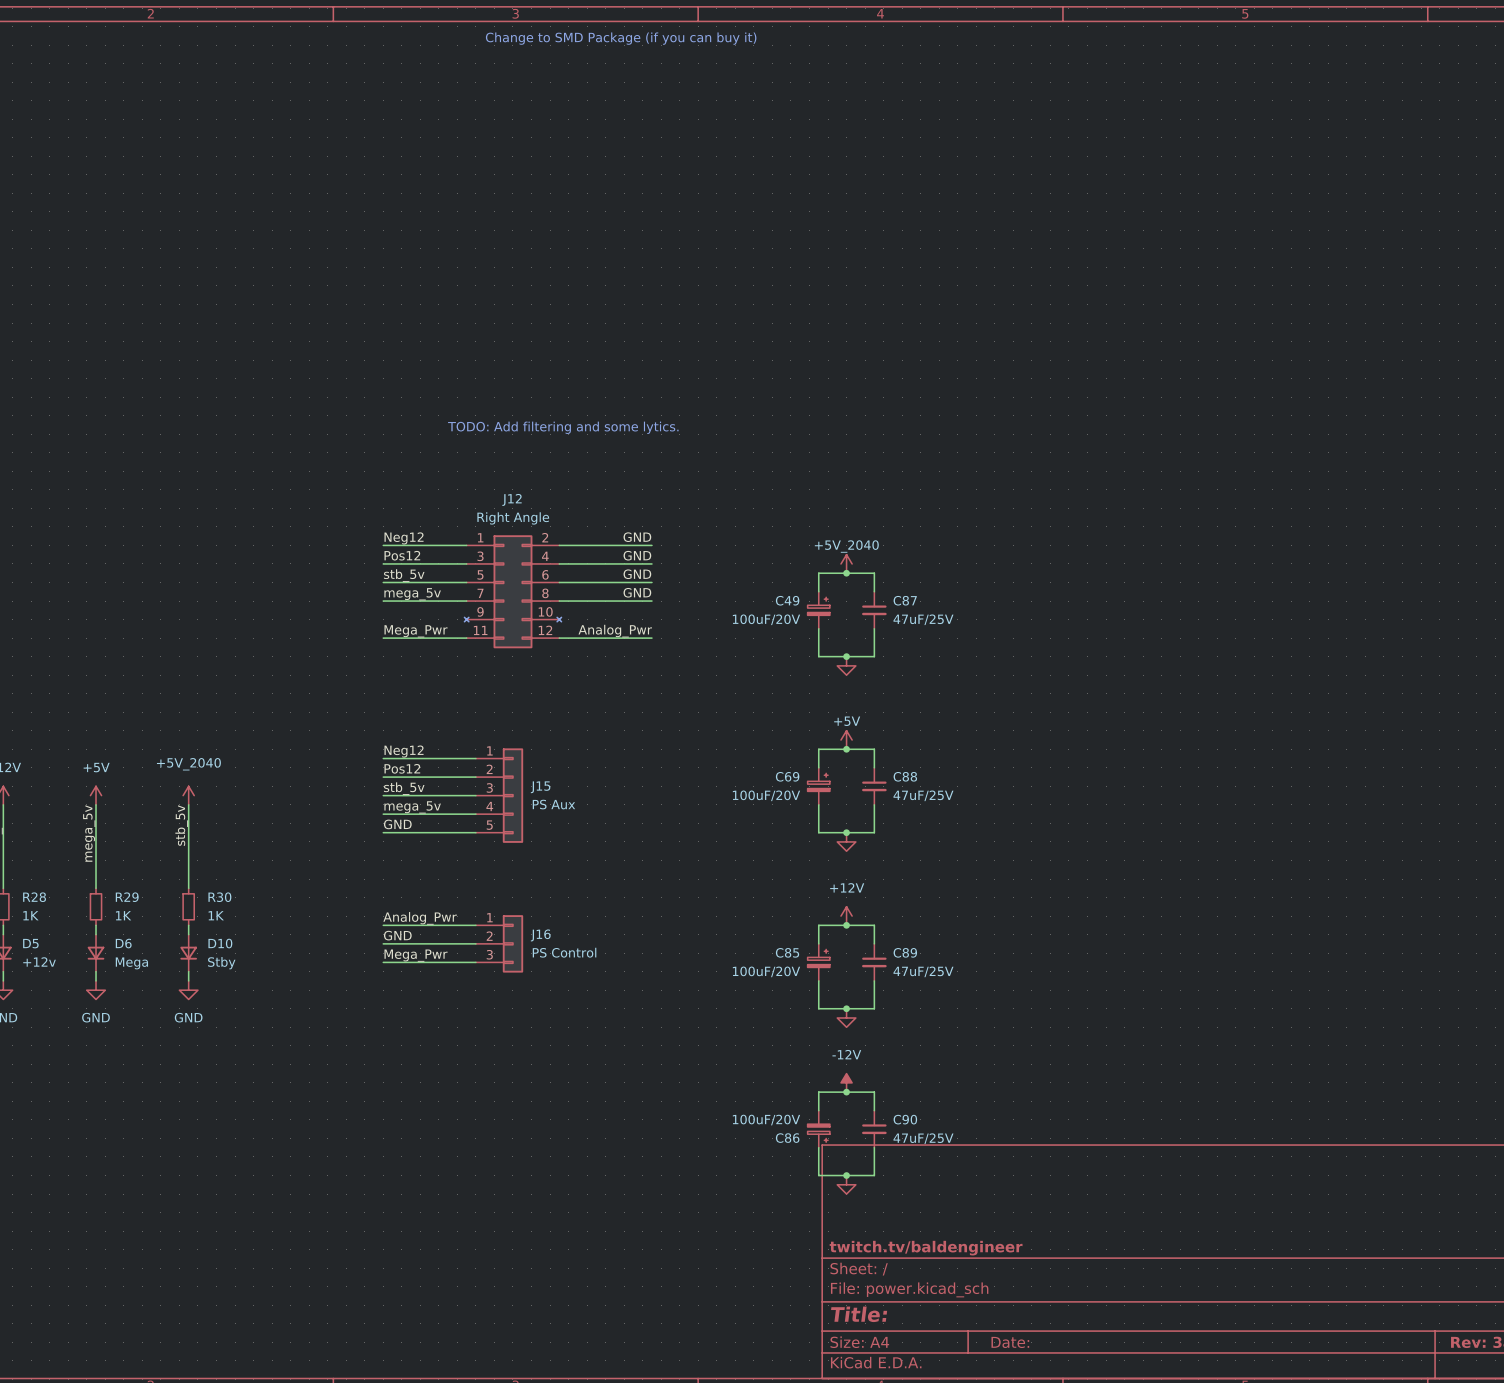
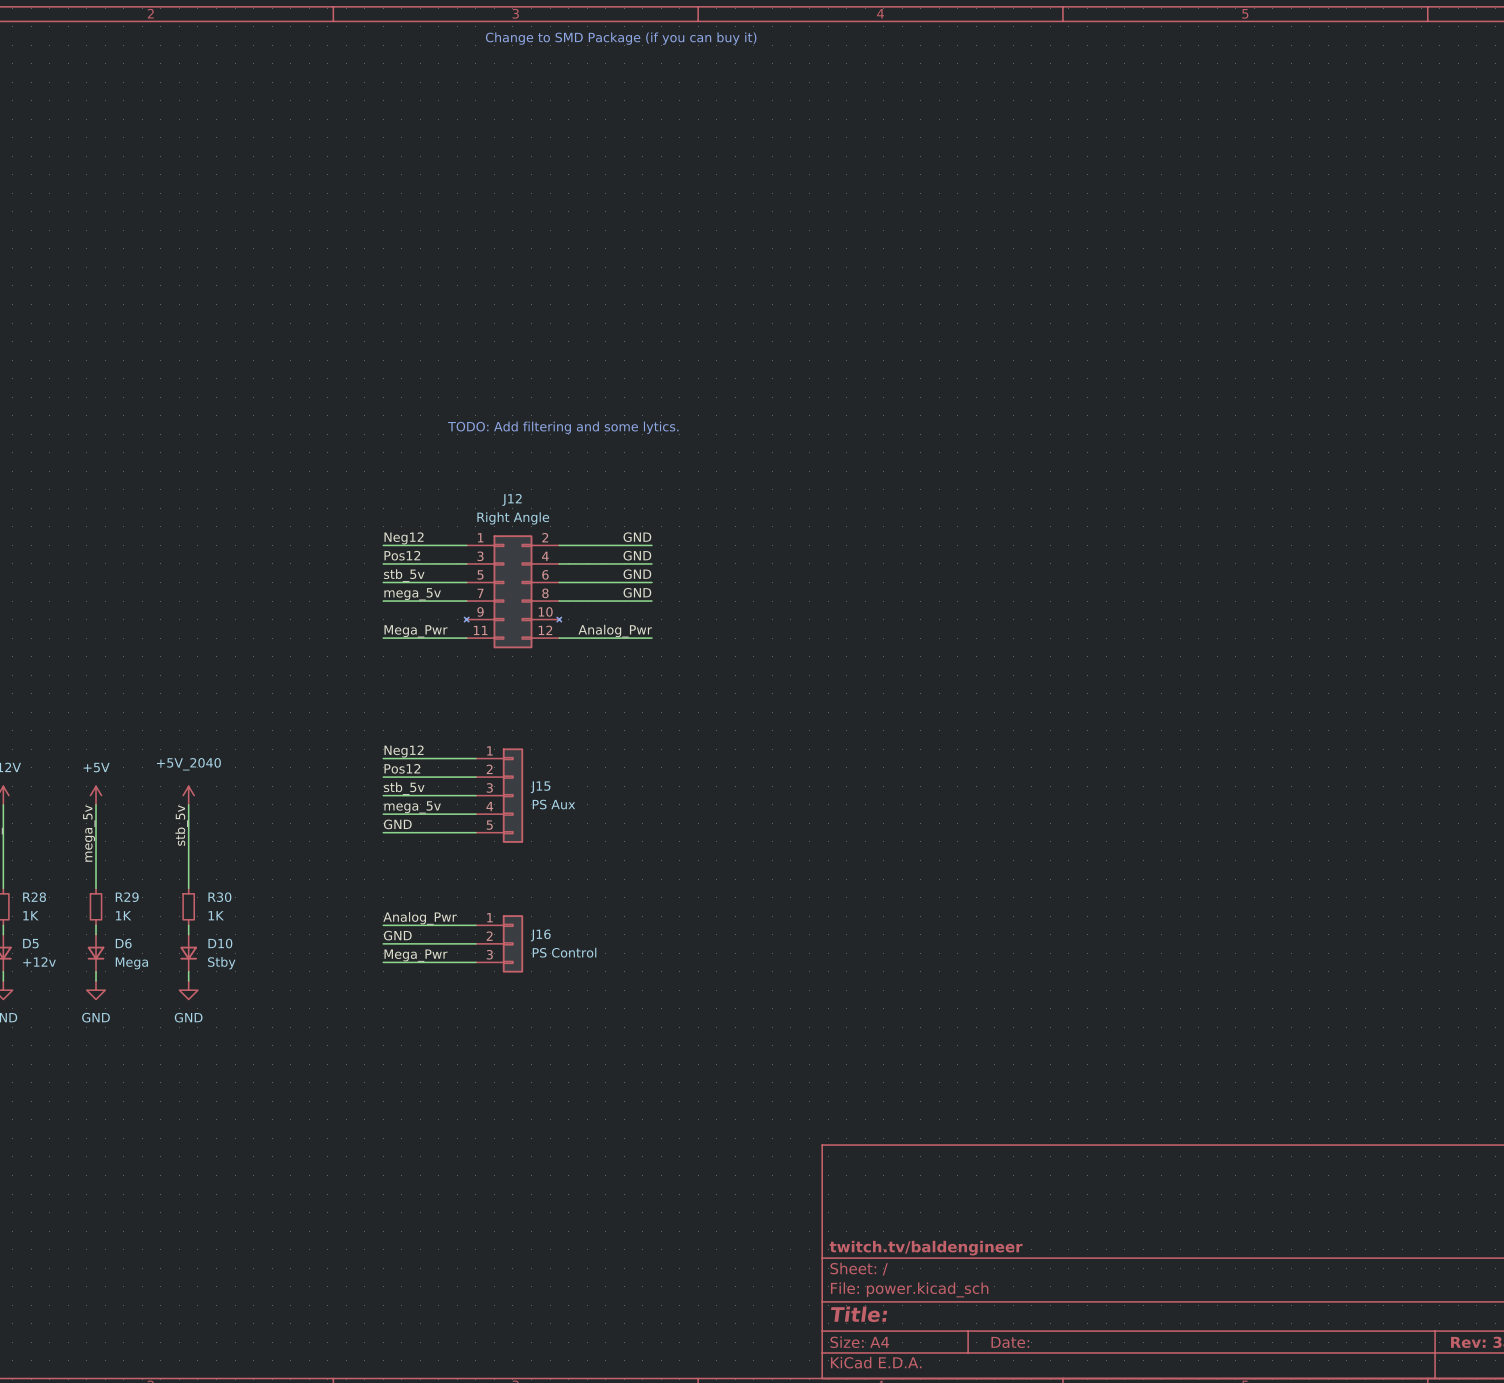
power symbol: +5V_2040 (846, 563) -> none
junction: (846, 573) -> none
wire: (818, 591) (818, 573) (874, 573) (874, 591) -> none
C49: 100uF/20V (818, 610) -> none
C87: 47uF/25V (874, 610) -> none
wire: (818, 628) (818, 656) (874, 656) (874, 628) -> none
junction: (846, 656) -> none
power symbol: (846, 665) -> none
power symbol: +5V (846, 740) -> none
junction: (846, 749) -> none
wire: (818, 767) (818, 749) (874, 749) (874, 767) -> none
C69: 100uF/20V (818, 786) -> none
C88: 47uF/25V (874, 786) -> none
wire: (818, 804) (818, 832) (874, 832) (874, 804) -> none
junction: (846, 832) -> none
power symbol: (846, 841) -> none
power symbol: +12V (846, 916) -> none
junction: (846, 925) -> none
wire: (818, 943) (818, 925) (874, 925) (874, 943) -> none
C85: 100uF/20V (818, 962) -> none
C89: 47uF/25V (874, 962) -> none
wire: (818, 980) (818, 1008) (874, 1008) (874, 980) -> none
junction: (846, 1008) -> none
power symbol: (846, 1018) -> none
power symbol: -12V (846, 1082) -> none
junction: (846, 1092) -> none
wire: (818, 1110) (818, 1092) (874, 1092) (874, 1110) -> none
C86: 100uF/20V (818, 1129) -> none
C90: 47uF/25V (874, 1129) -> none
wire: (818, 1147) (818, 1175) (874, 1175) (874, 1147) -> none
junction: (846, 1175) -> none
power symbol: (846, 1184) -> none

